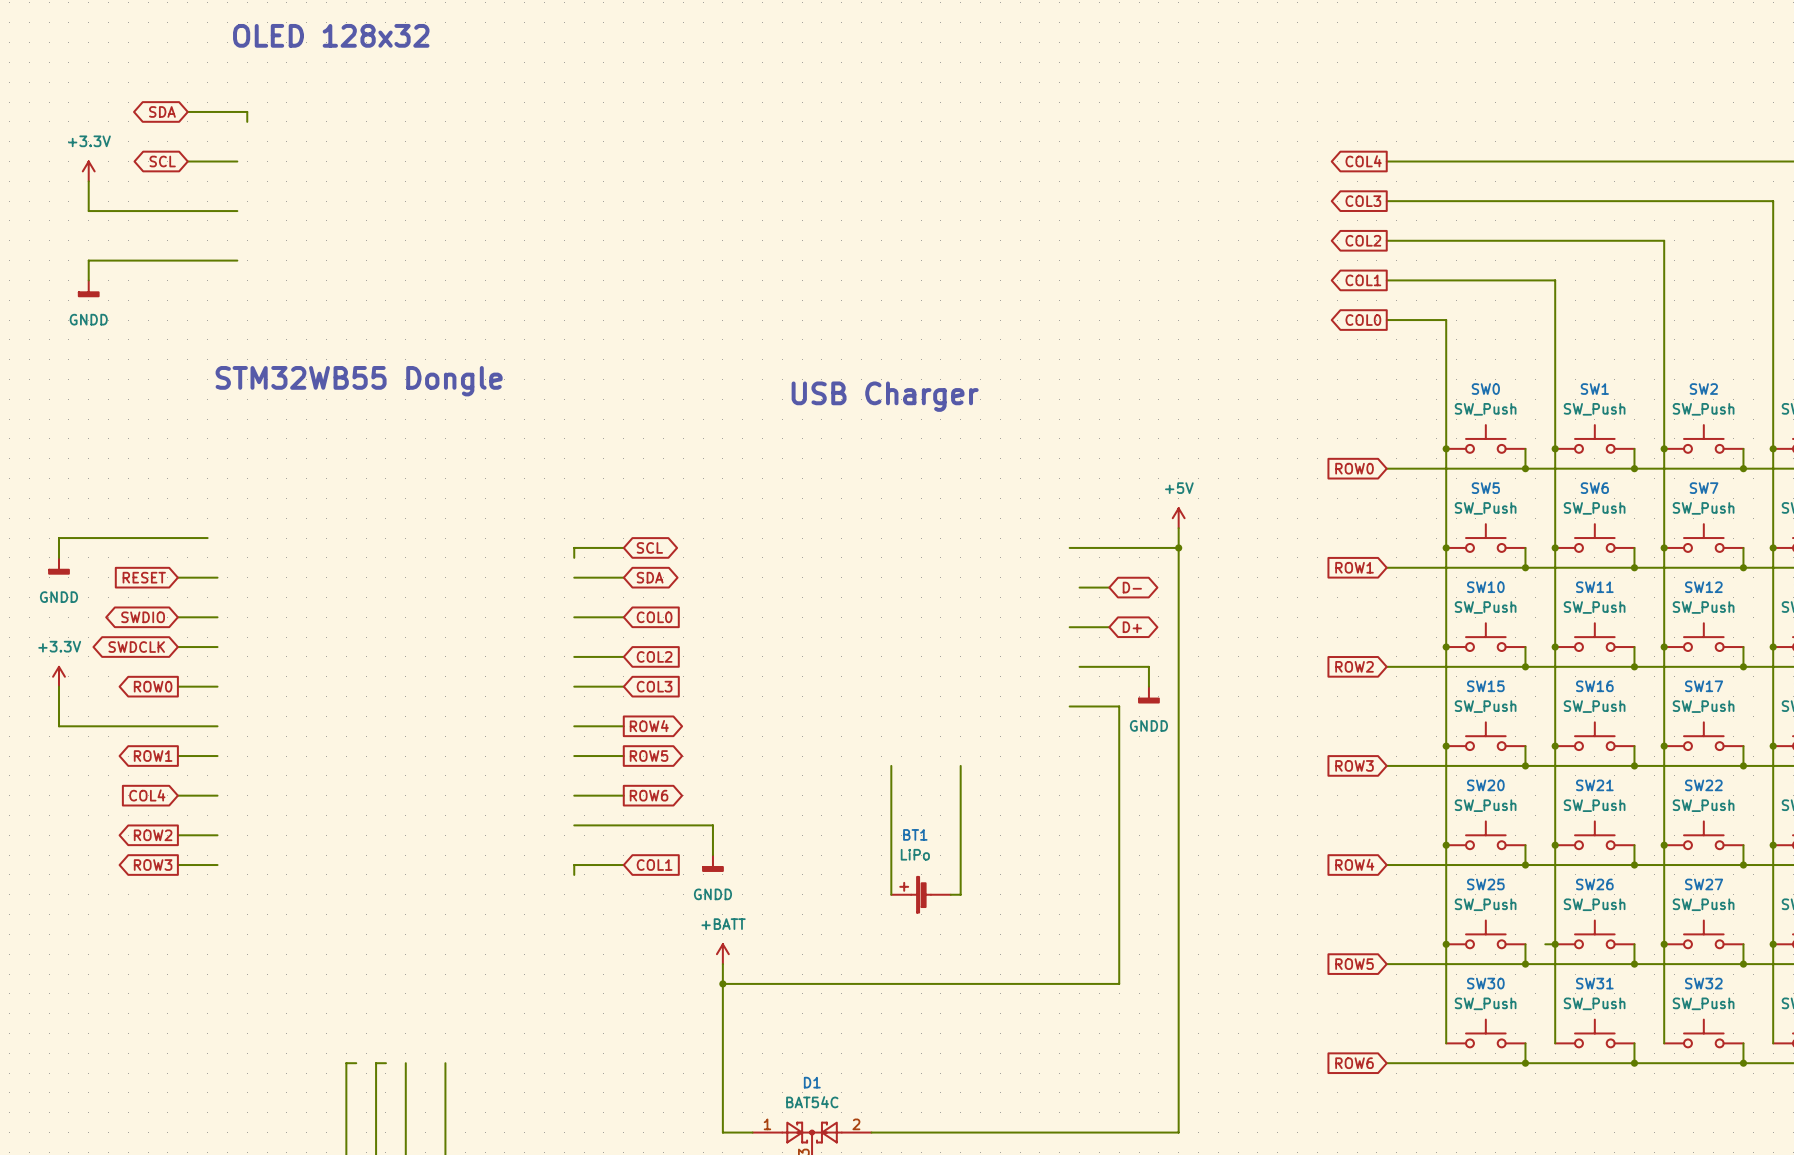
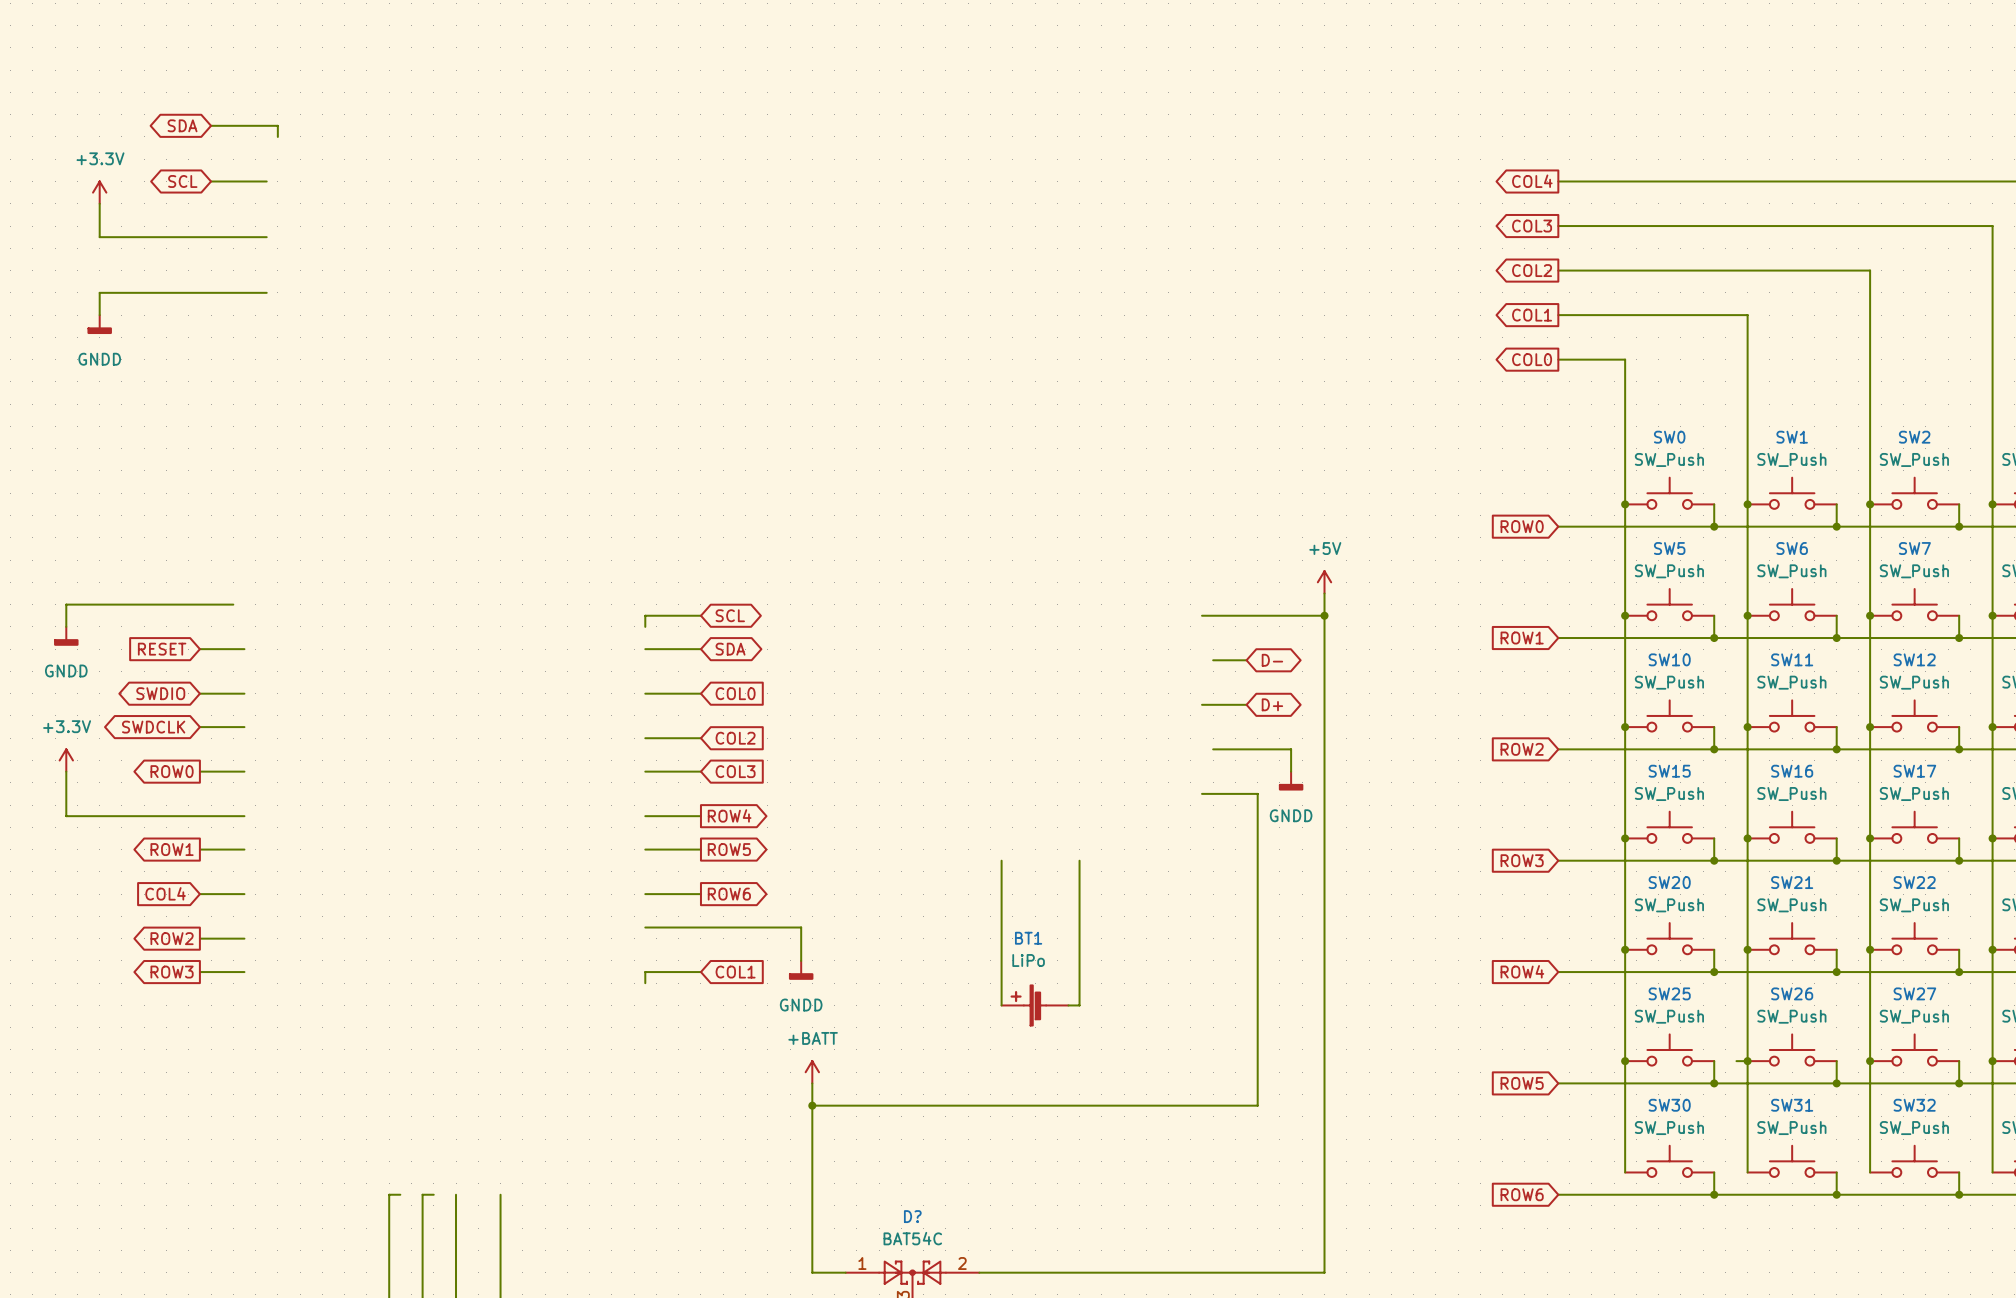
text: OLED 128x32 (331, 35) -> none
text: STM32WB55 Dongle (359, 381) -> none
text: USB Charger (885, 396) -> none
D1 name: D1 (812, 1082) -> D? (912, 1216)

